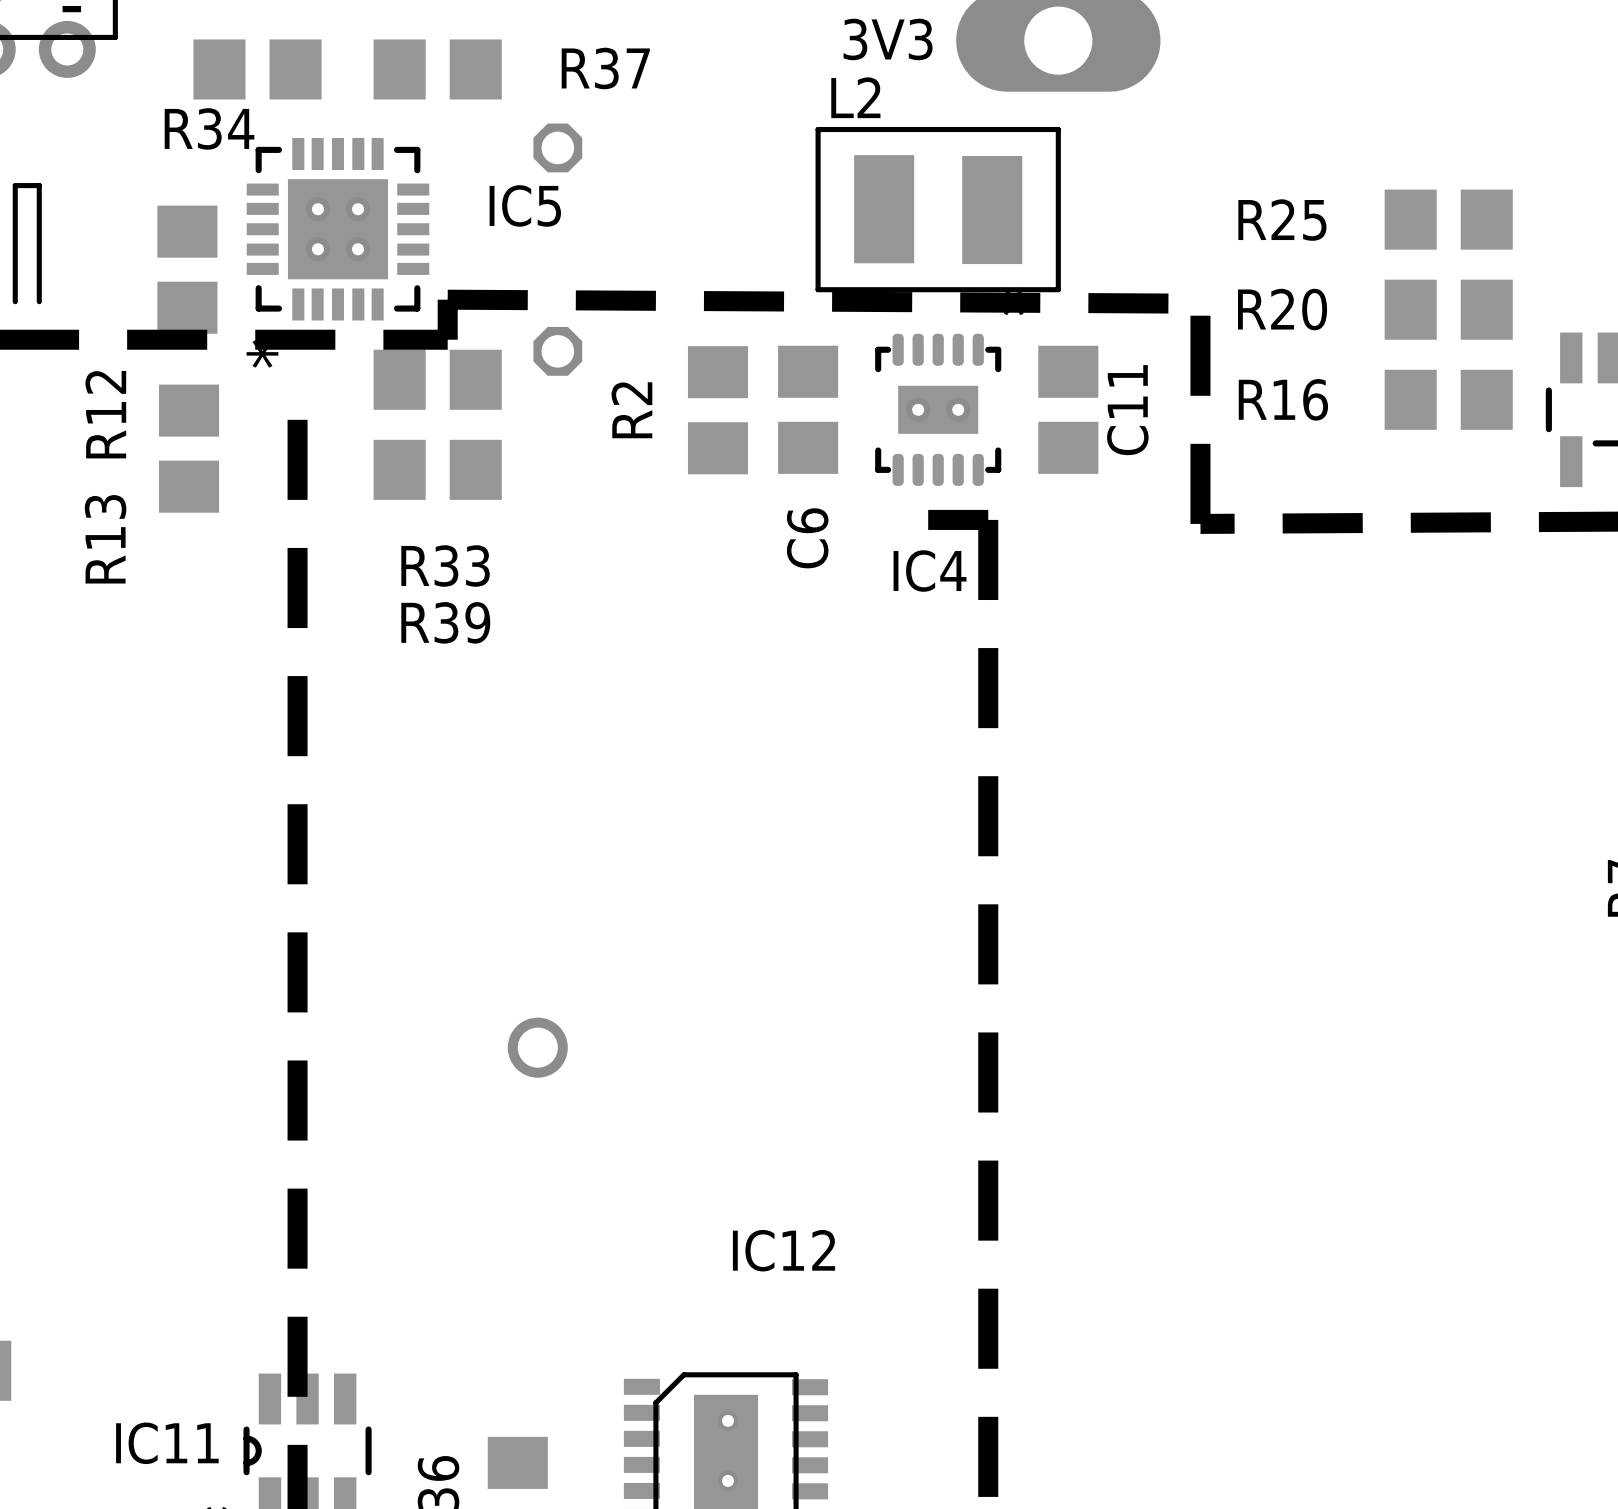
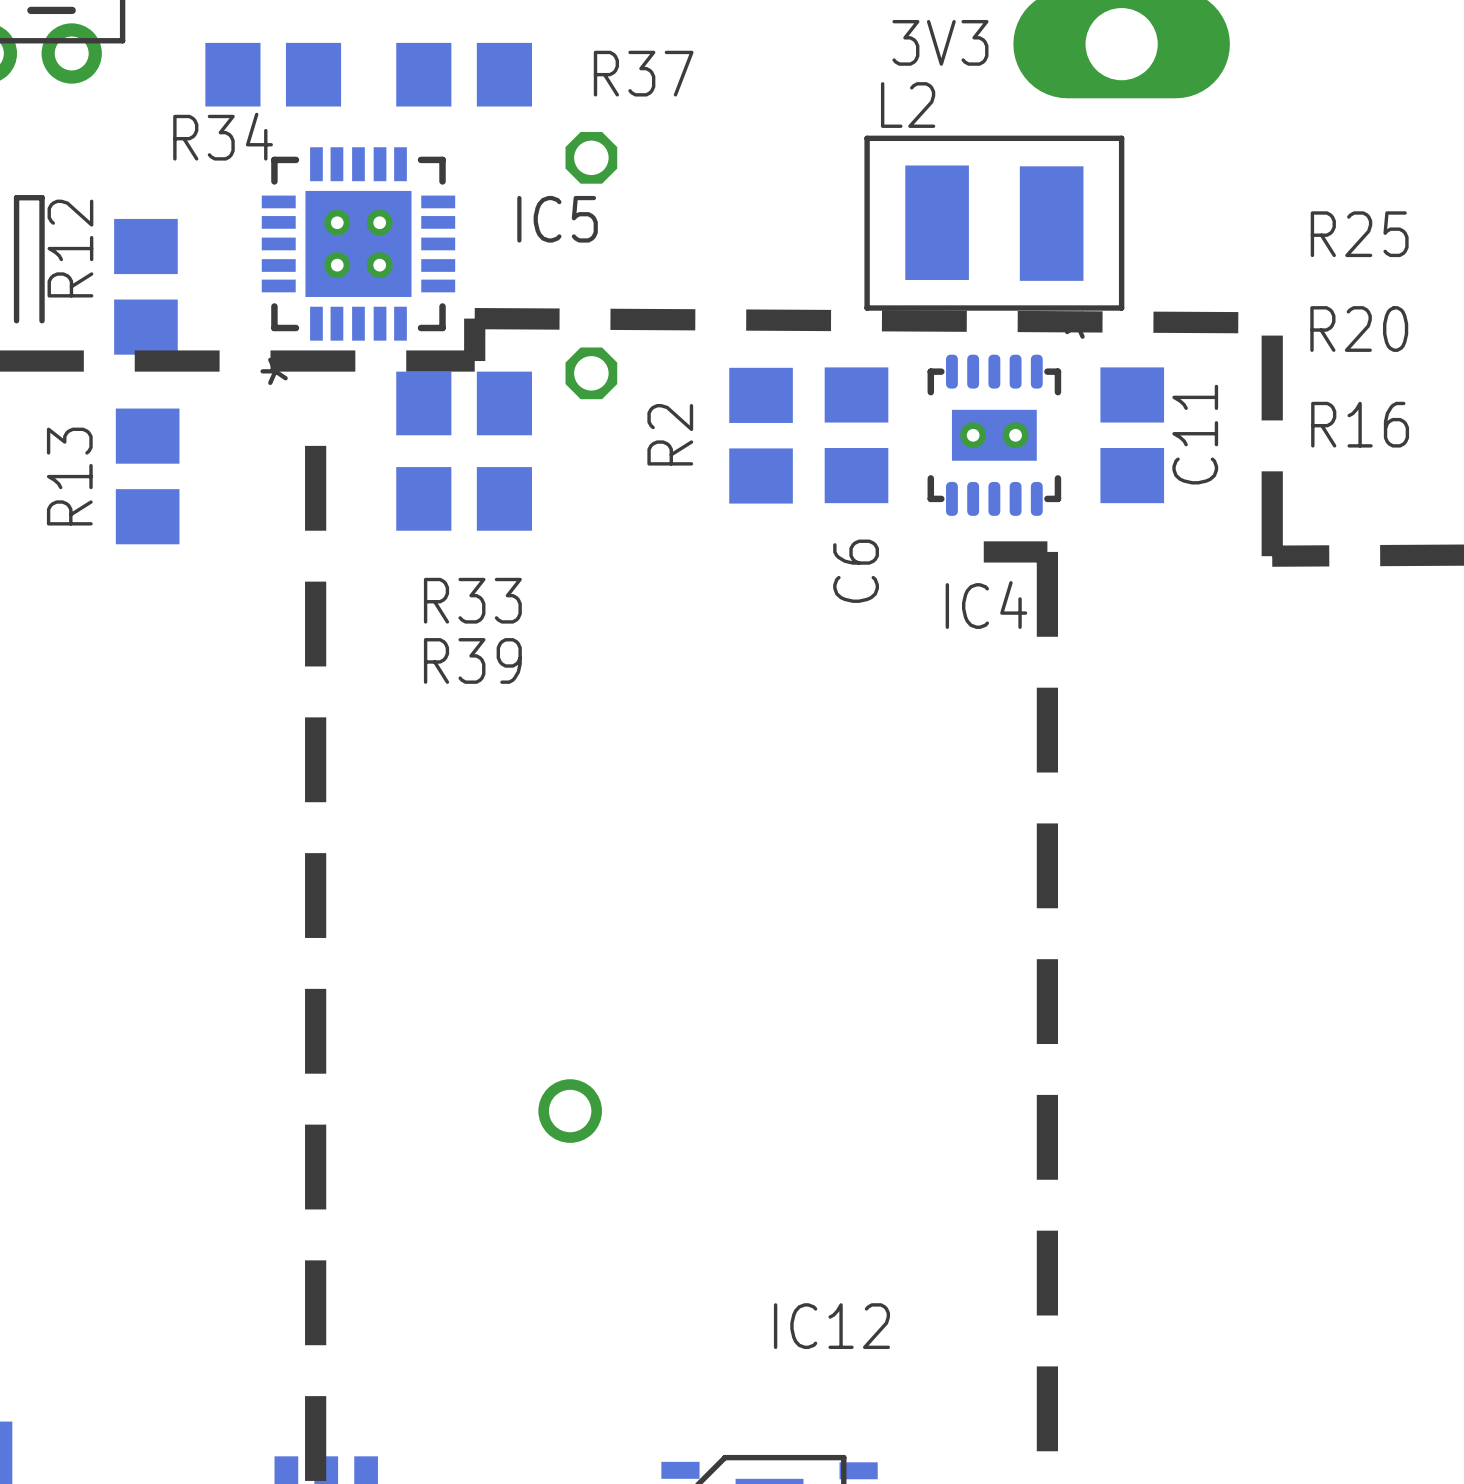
R12 position: (187, 269) -> (145, 286)
R12 name position: R12 (105, 414) -> R12 (70, 248)
R13 position: (189, 448) -> (147, 476)
R13 name position: R13 (105, 539) -> R13 (69, 476)

